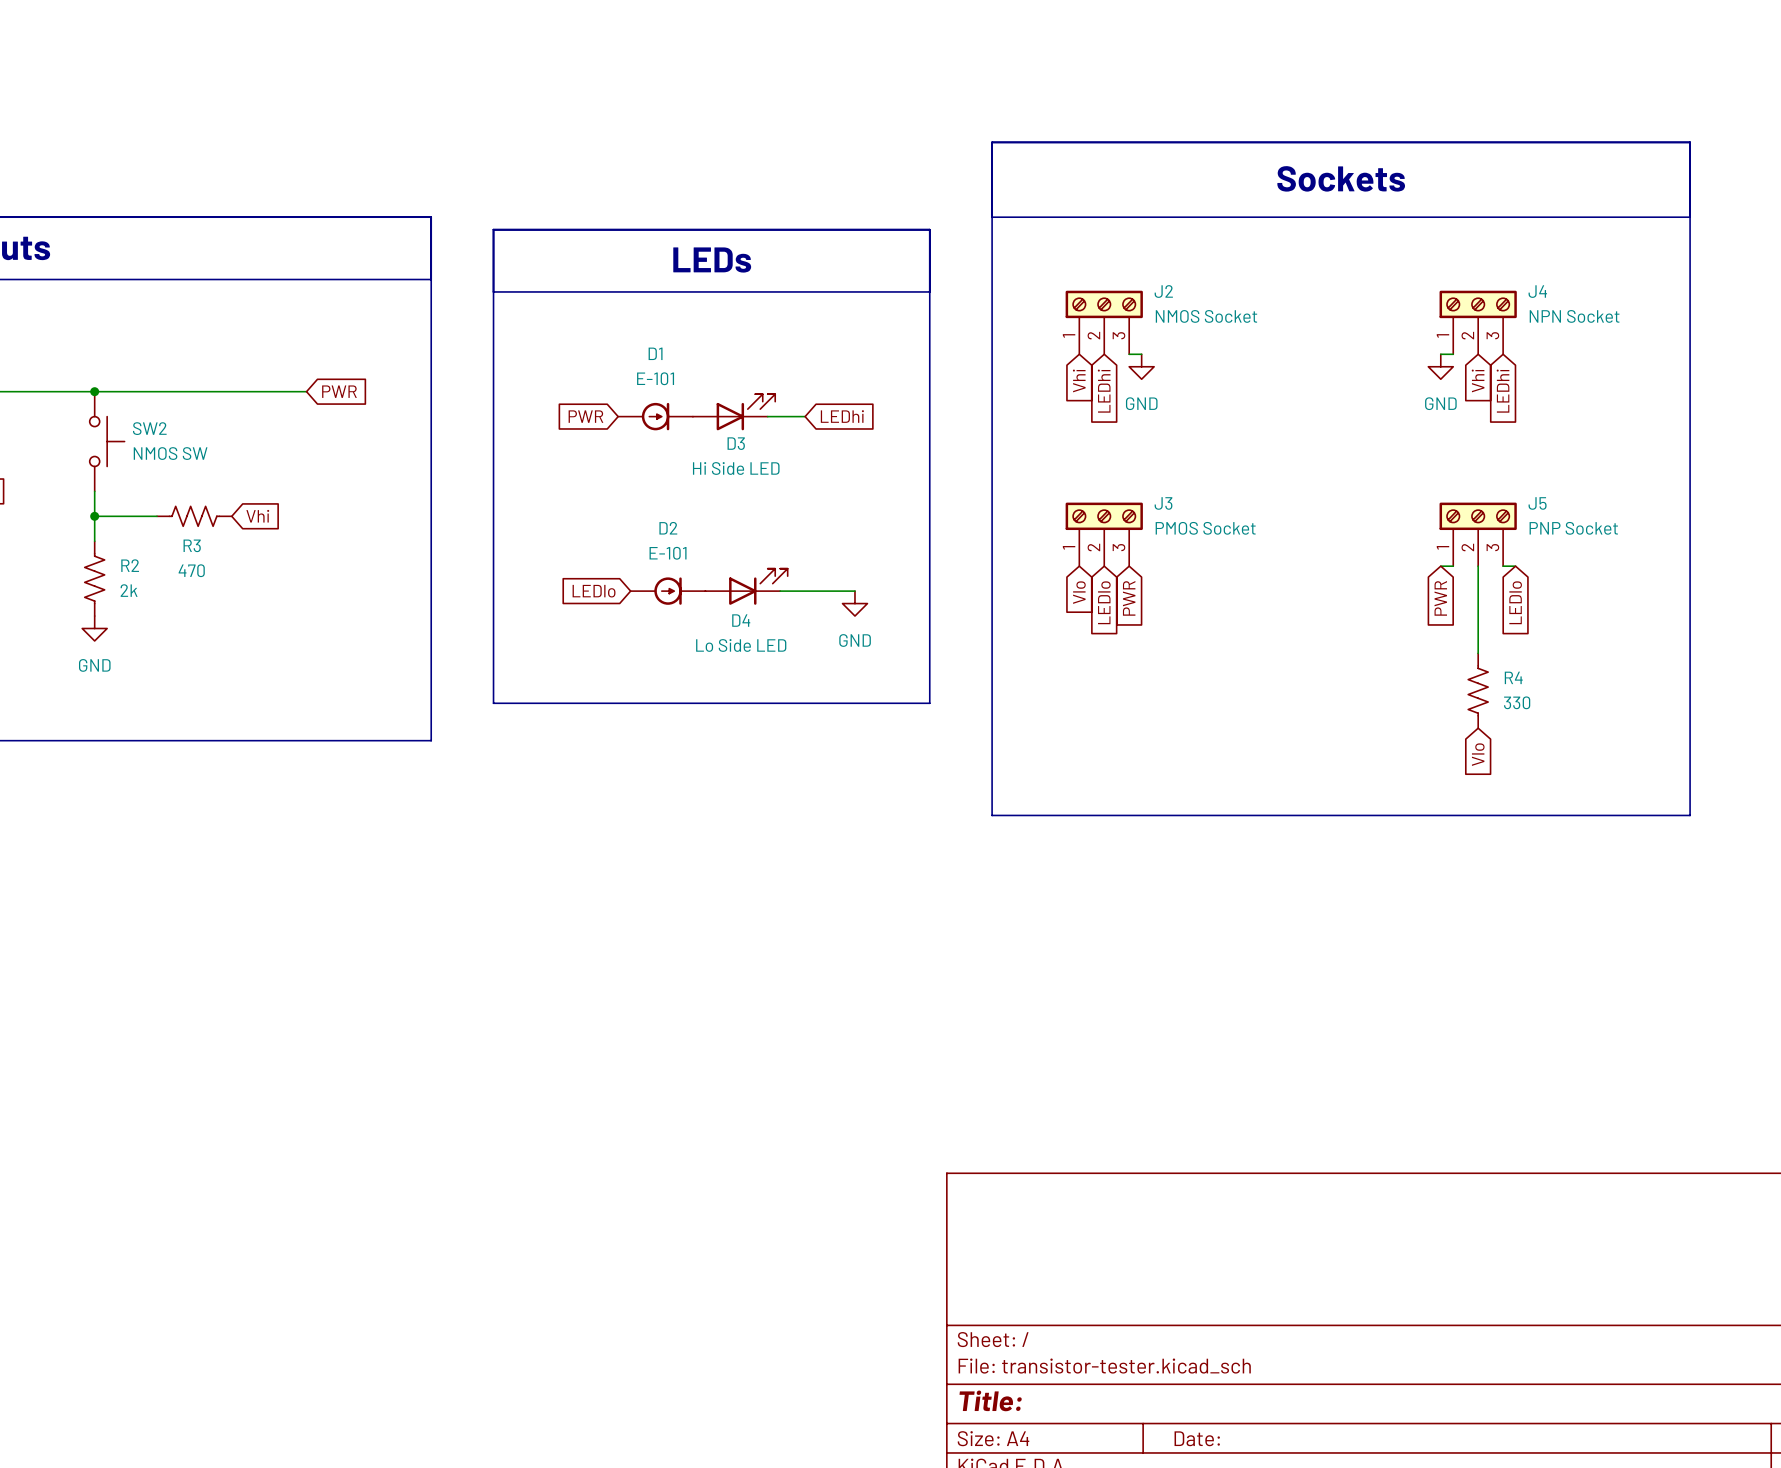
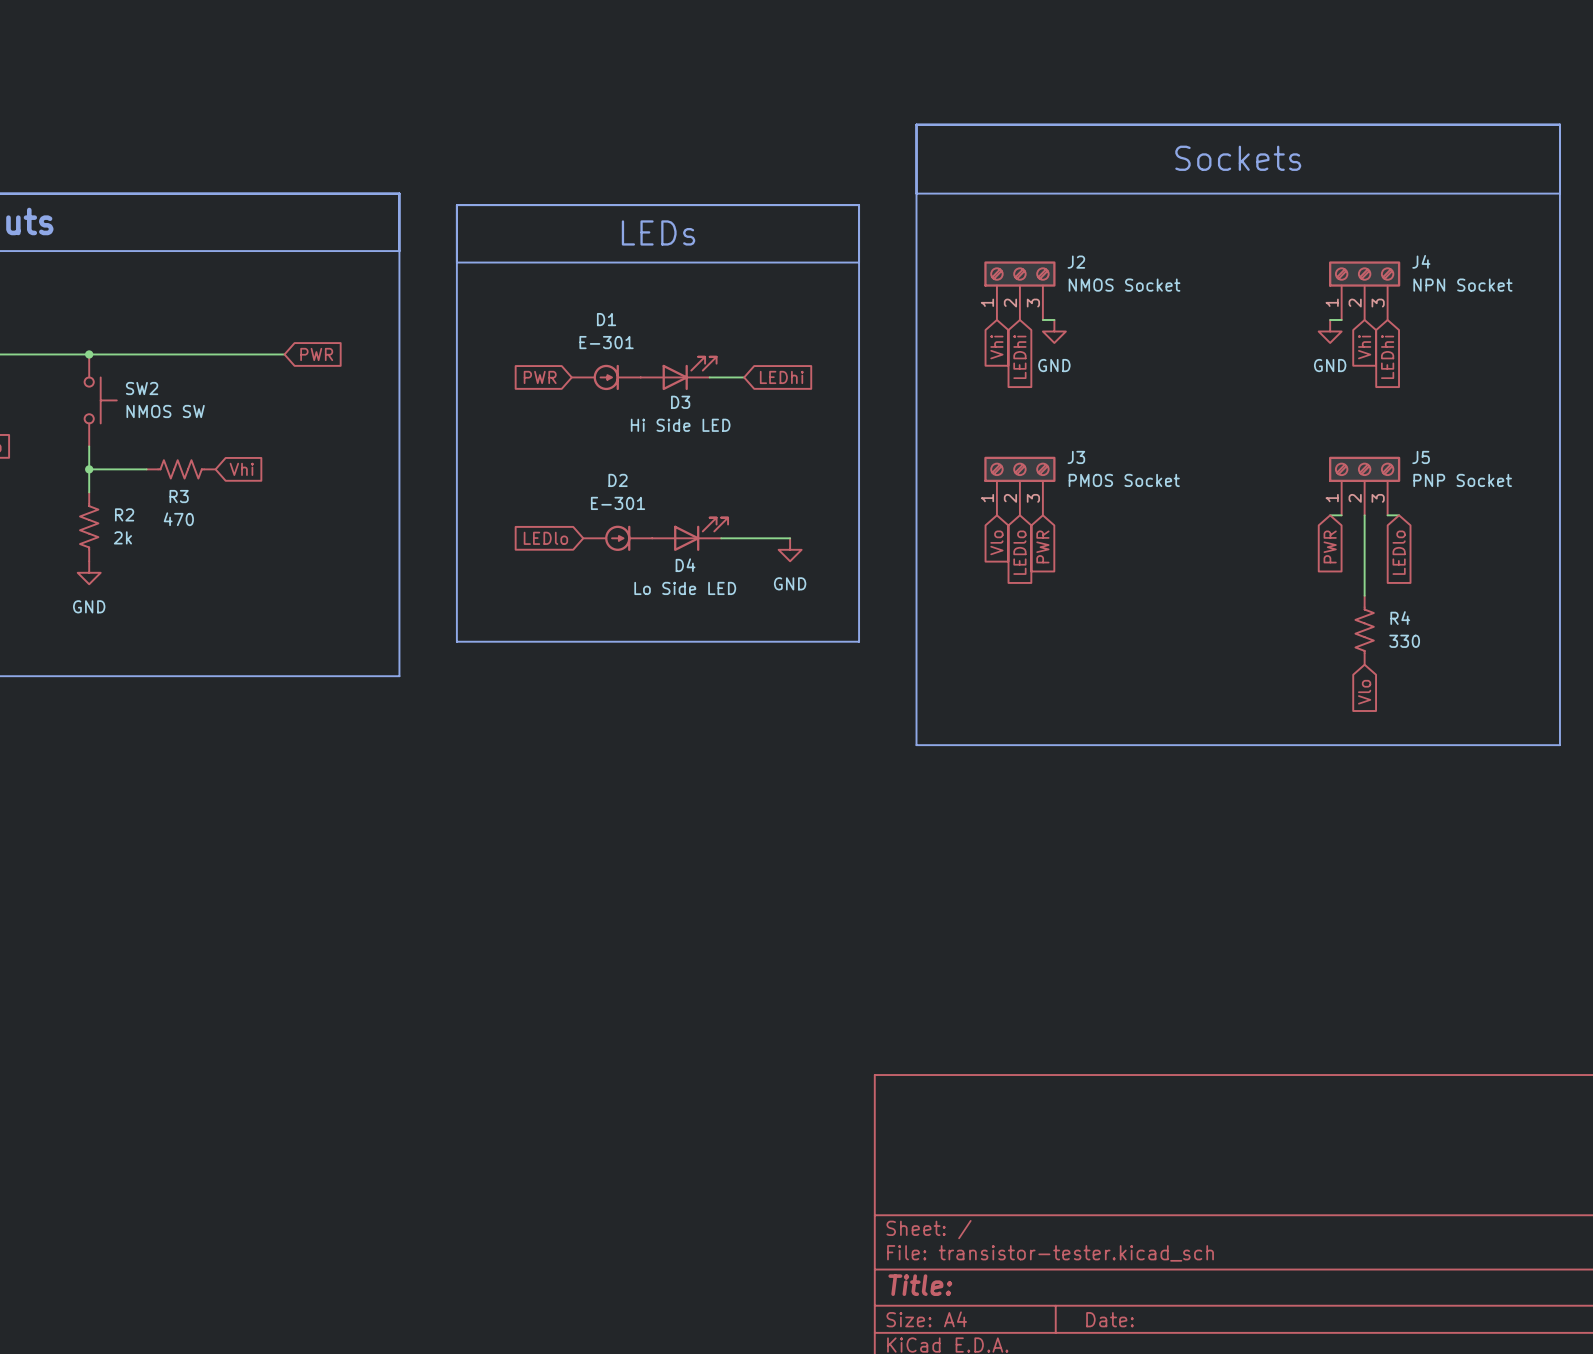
D1 value: E-101 (655, 378) -> E-301 (606, 342)
D2 value: E-101 (668, 553) -> E-301 (618, 503)

